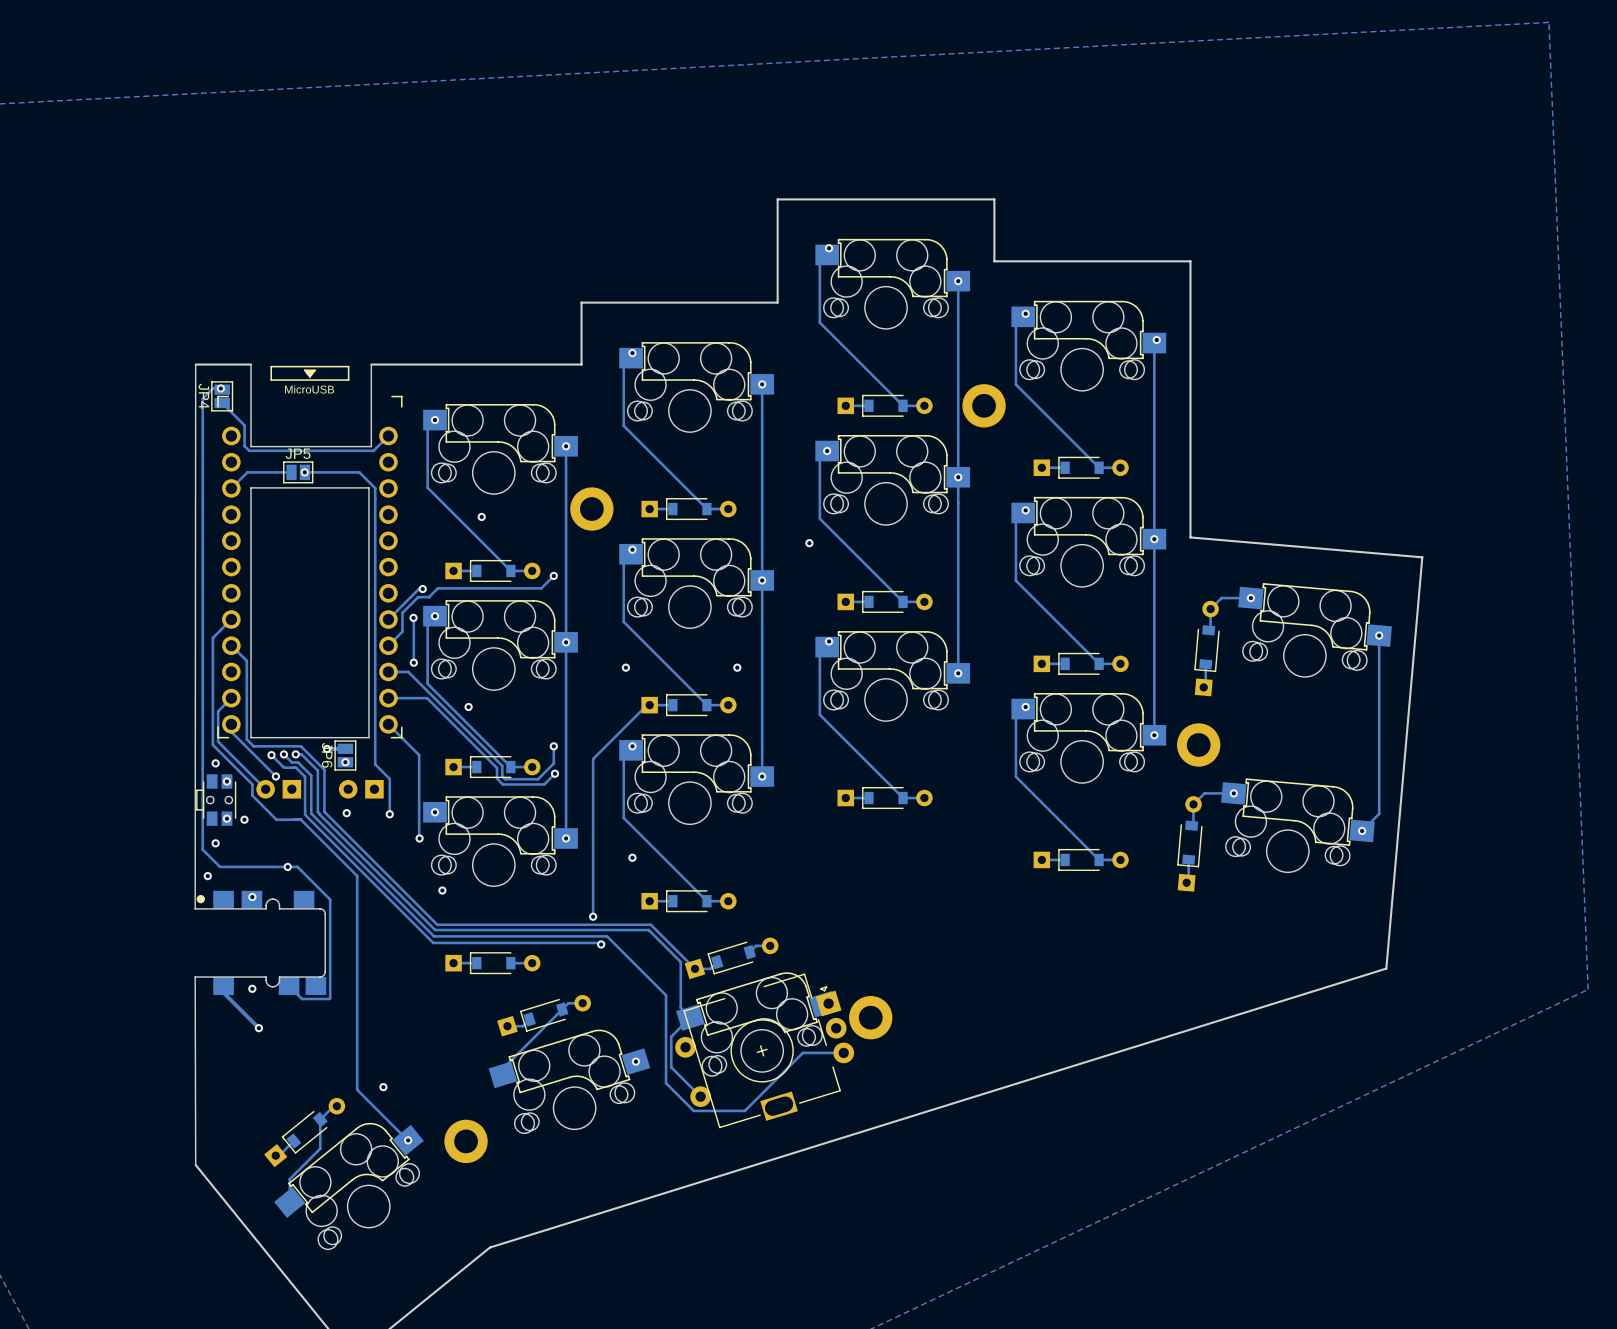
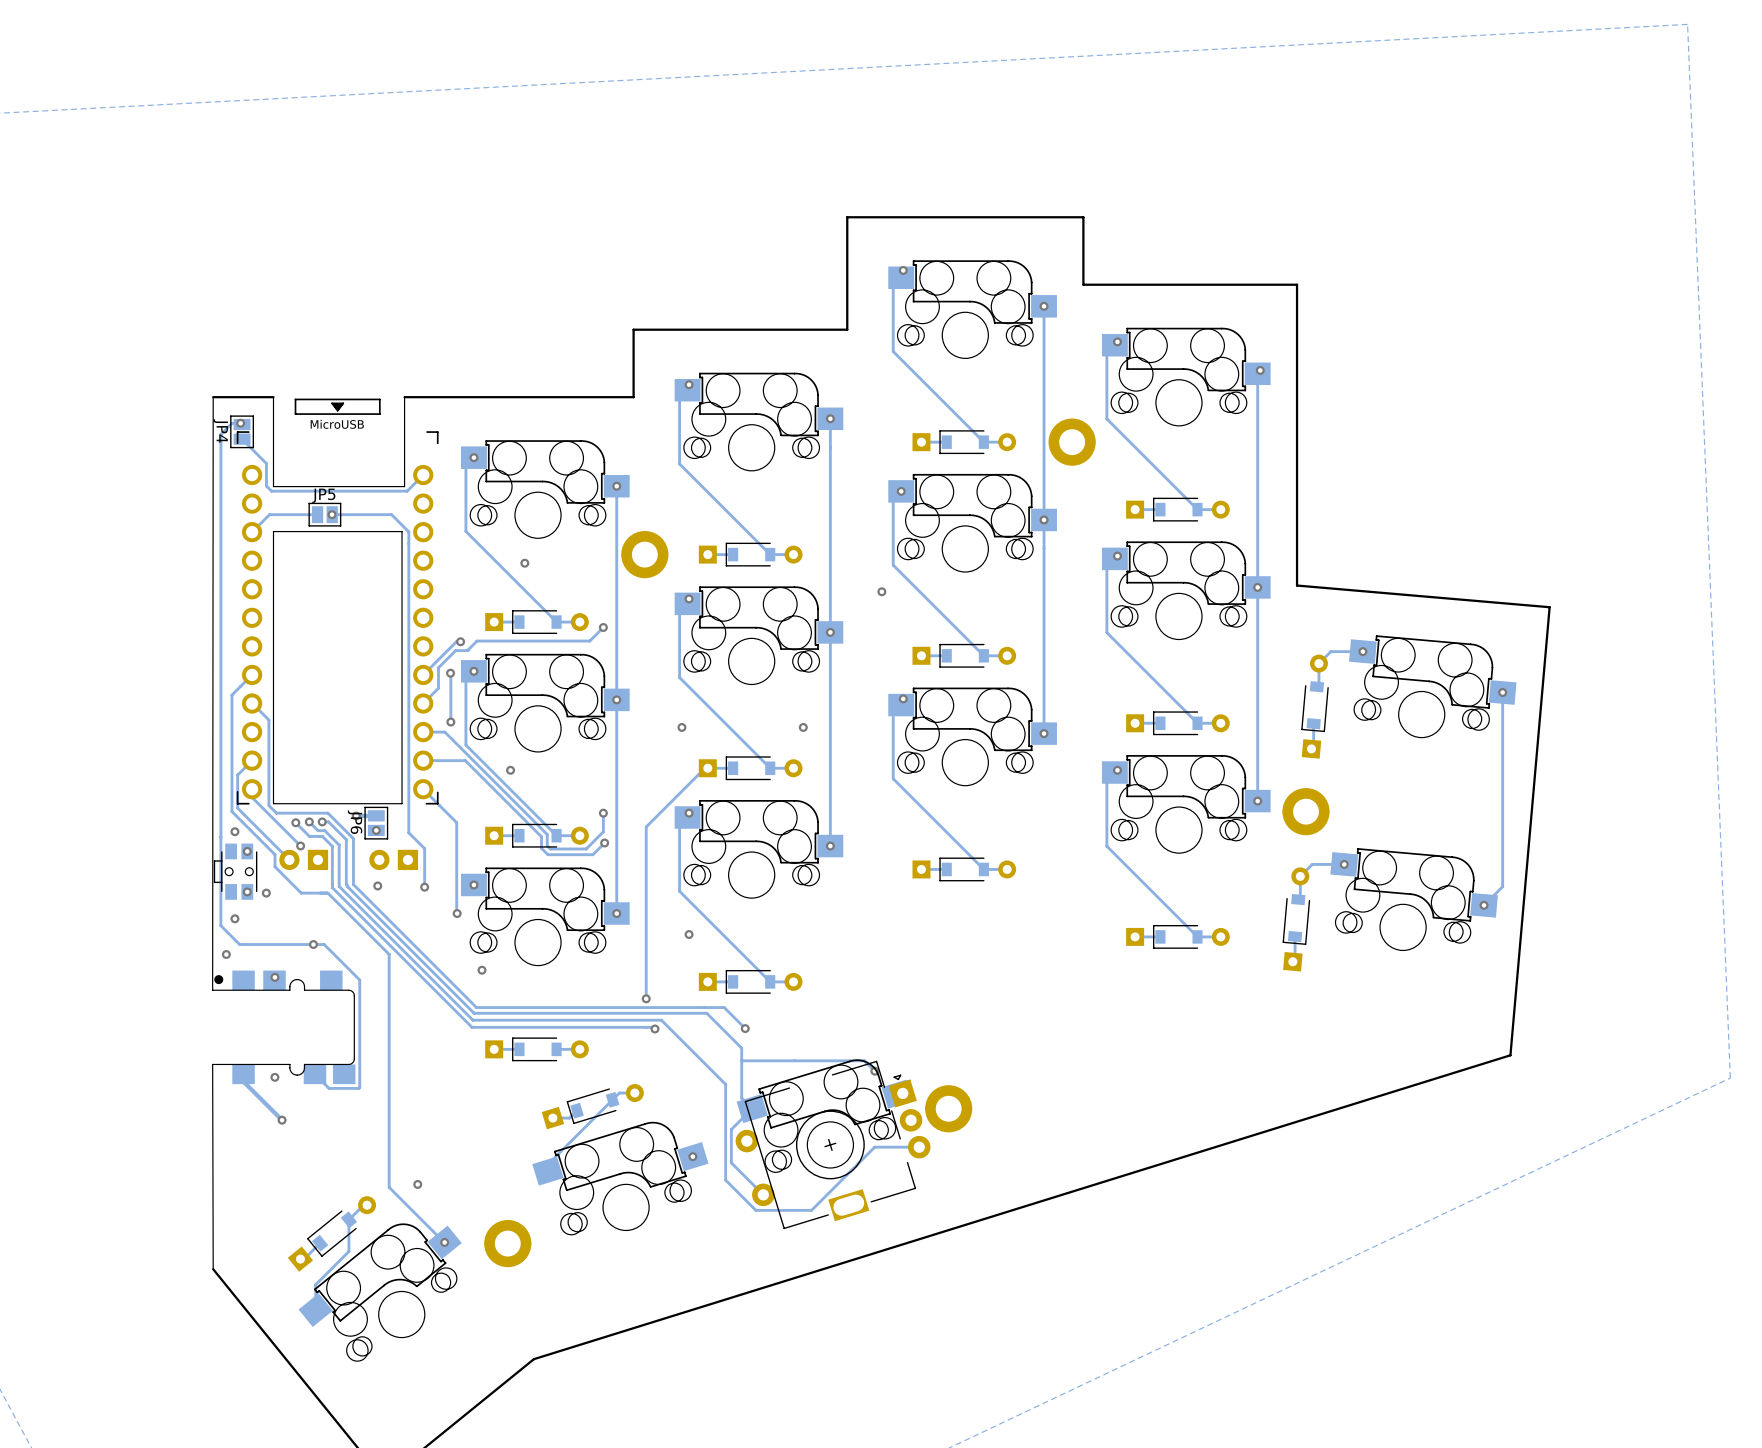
track: (650, 924) (695, 968) (710, 968) (717, 962) -> (709, 1007) (724, 1007) (745, 1028)
via: none -> (745, 1028)
track: (770, 945) (756, 945) (749, 952) -> none
part: (731, 958) -> none
track: none -> (741, 1060) (864, 1060) (874, 1071)
via: none -> (874, 1071)

